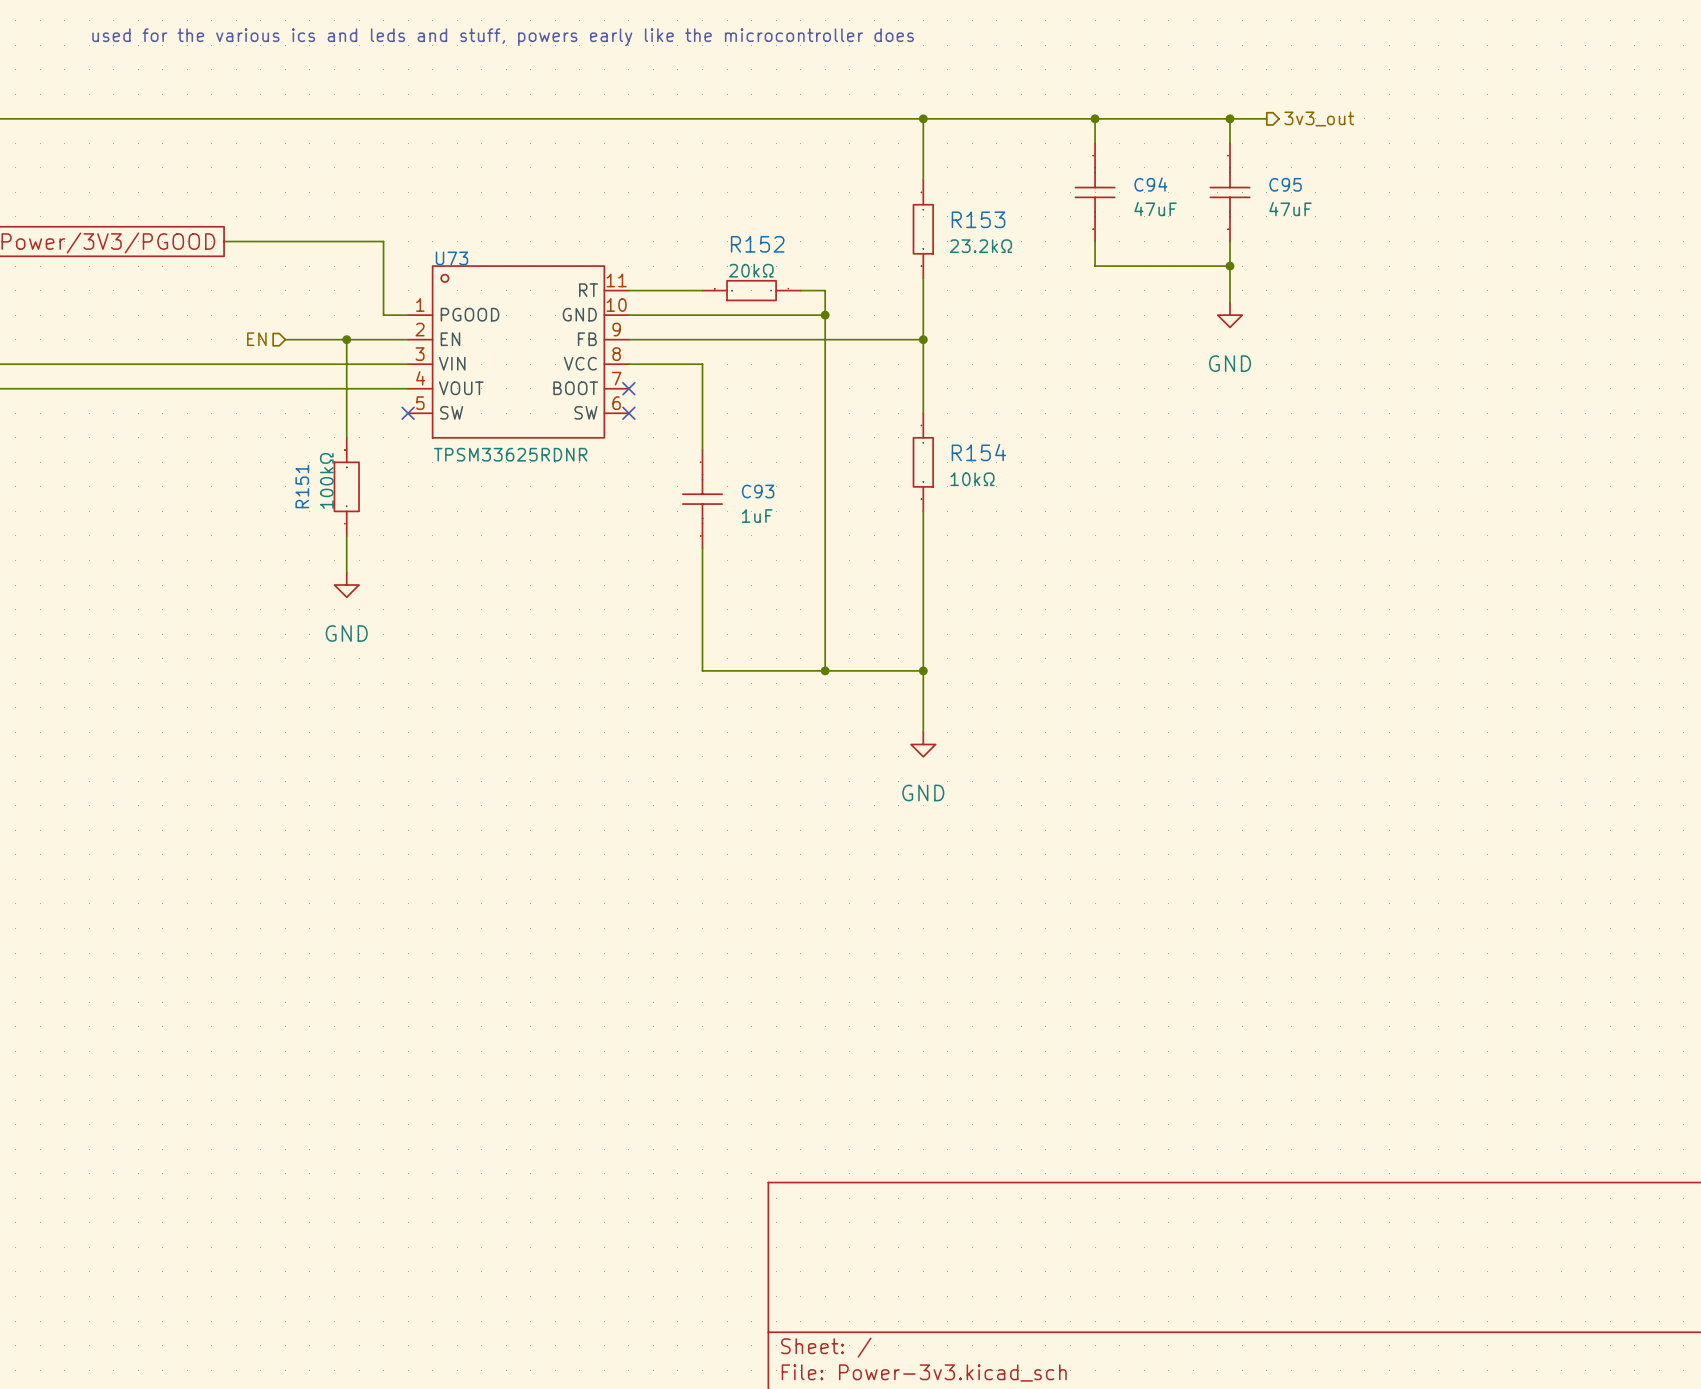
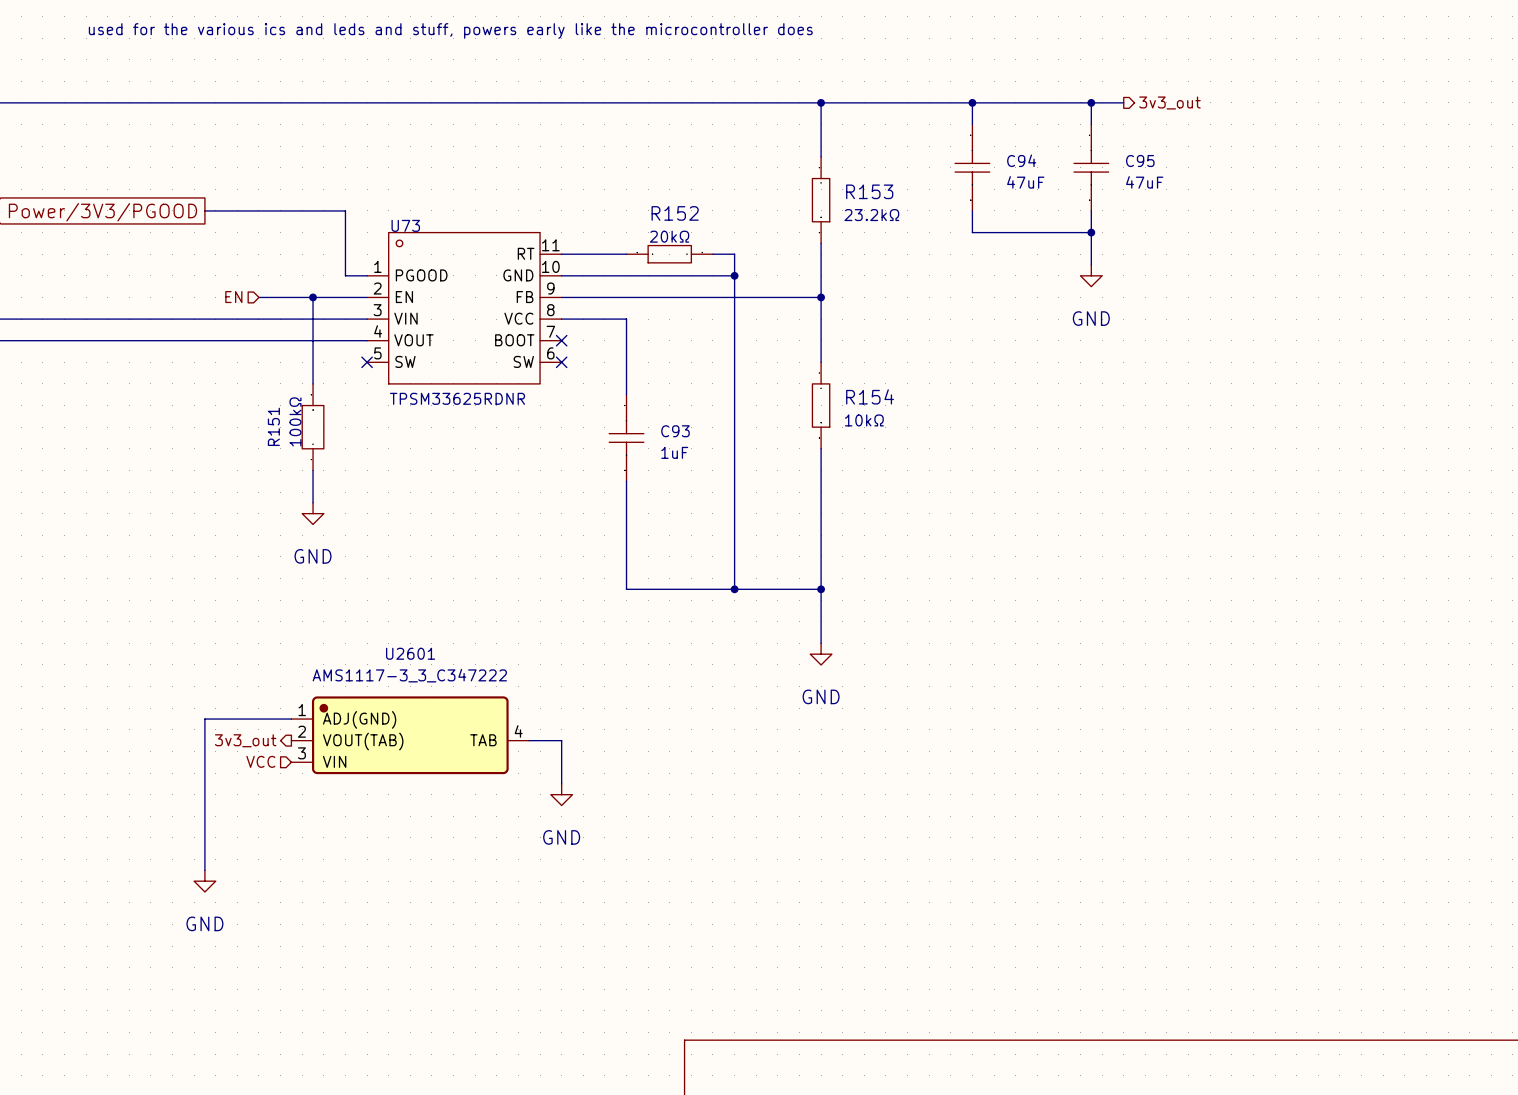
wire: none -> (291, 719) (204, 719) (204, 870)
U2601: none -> AMS1117-3_3_C347222 (410, 735)
hierarchical label: none -> 3v3_out (245, 740)
wire: none -> (529, 740) (561, 740) (561, 783)
hierarchical label: none -> VCC (260, 761)
power symbol: none -> GND (561, 794)
power symbol: none -> GND (204, 881)

